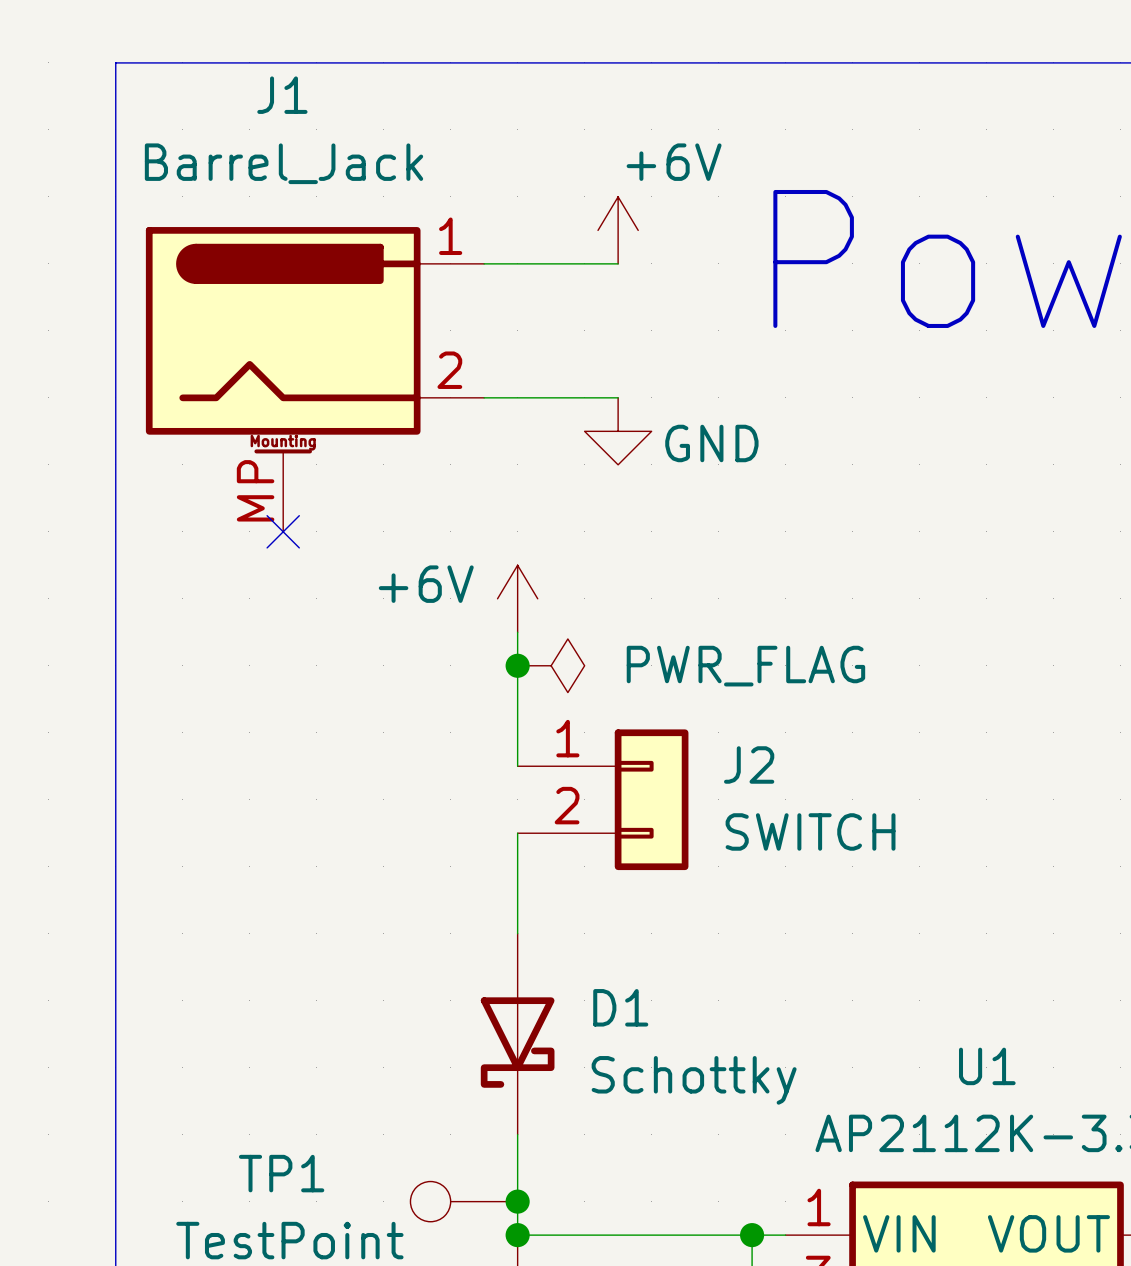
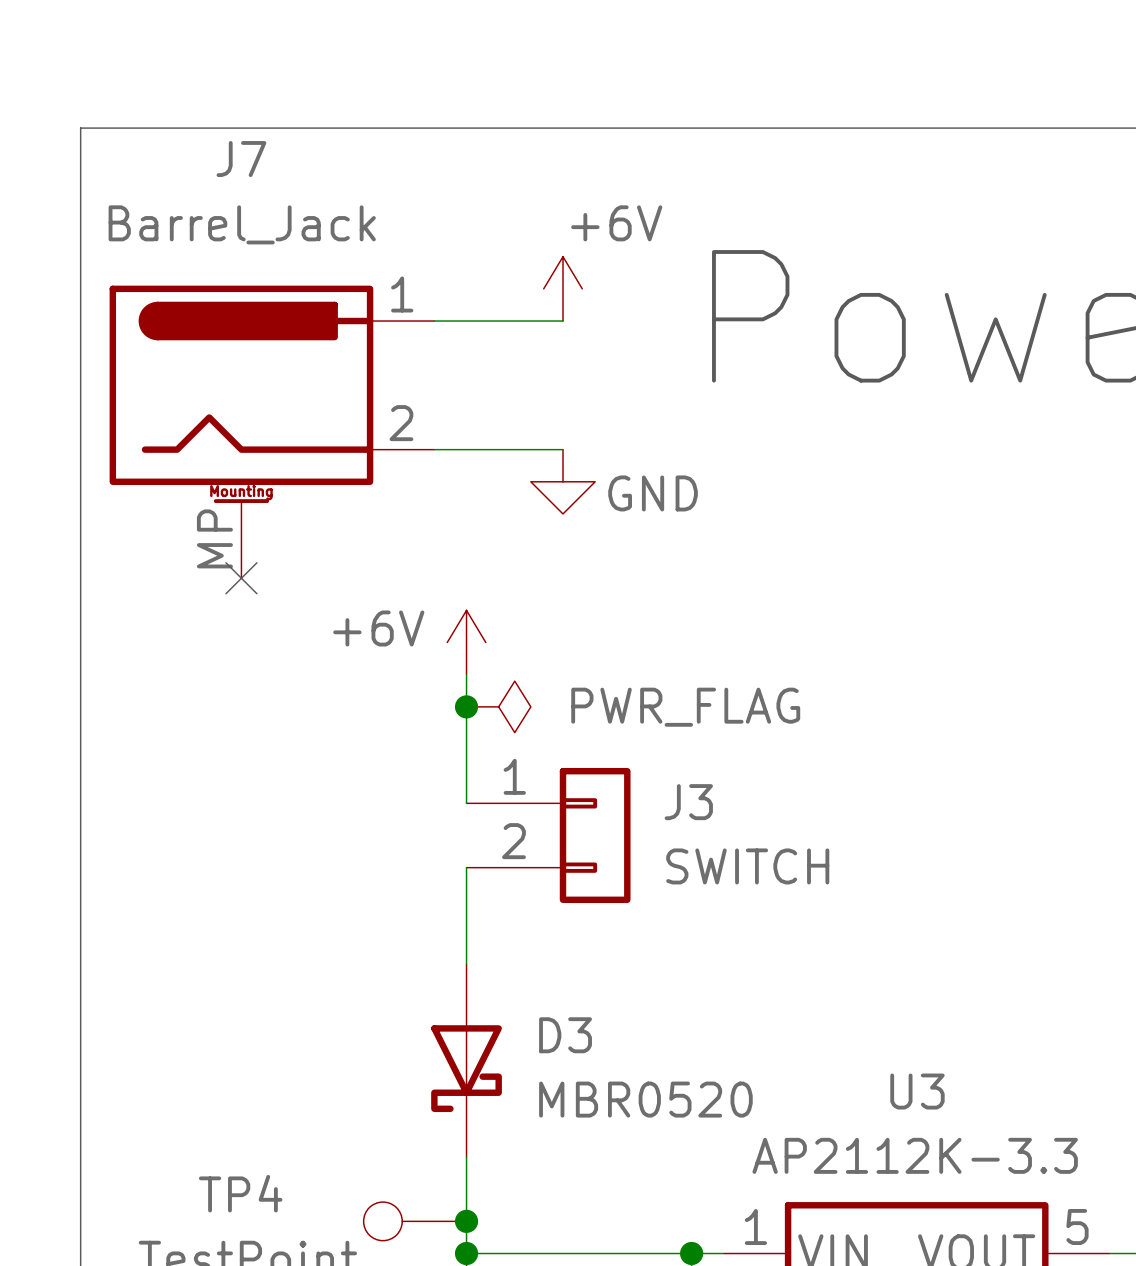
J1 name: J1 (282, 95) -> J7 (241, 159)
J2 name: J2 (749, 764) -> J3 (688, 802)
D1 name: D1 (620, 1007) -> D3 (565, 1035)
U1 name: U1 (987, 1066) -> U3 (917, 1091)
D1 value: Schottky (694, 1080) -> MBR0520 (645, 1099)
TP1 name: TP1 (281, 1173) -> TP4 (240, 1193)

